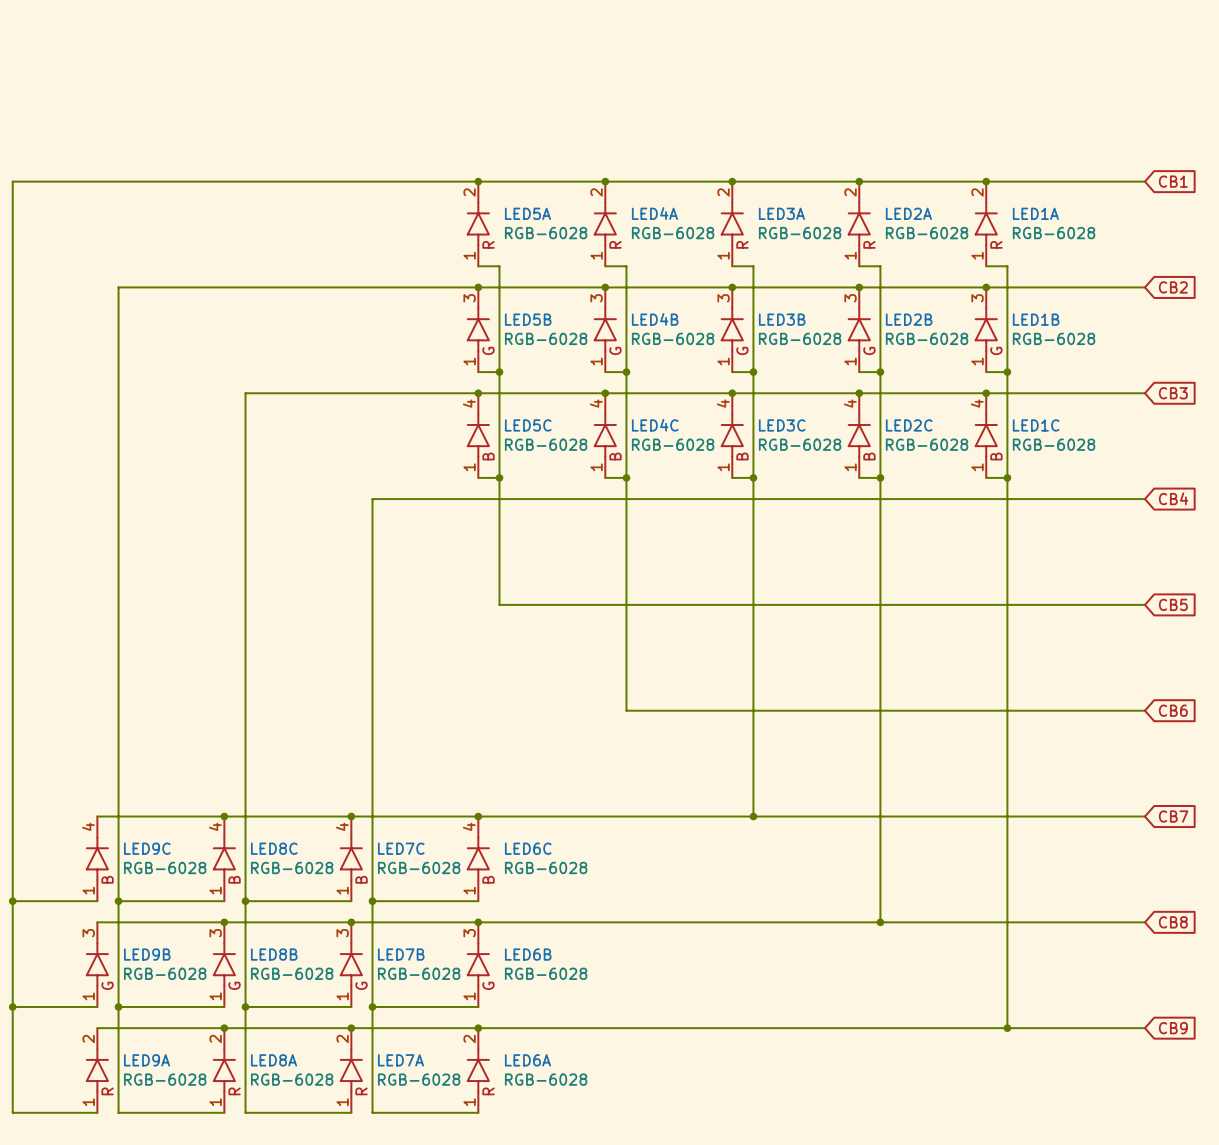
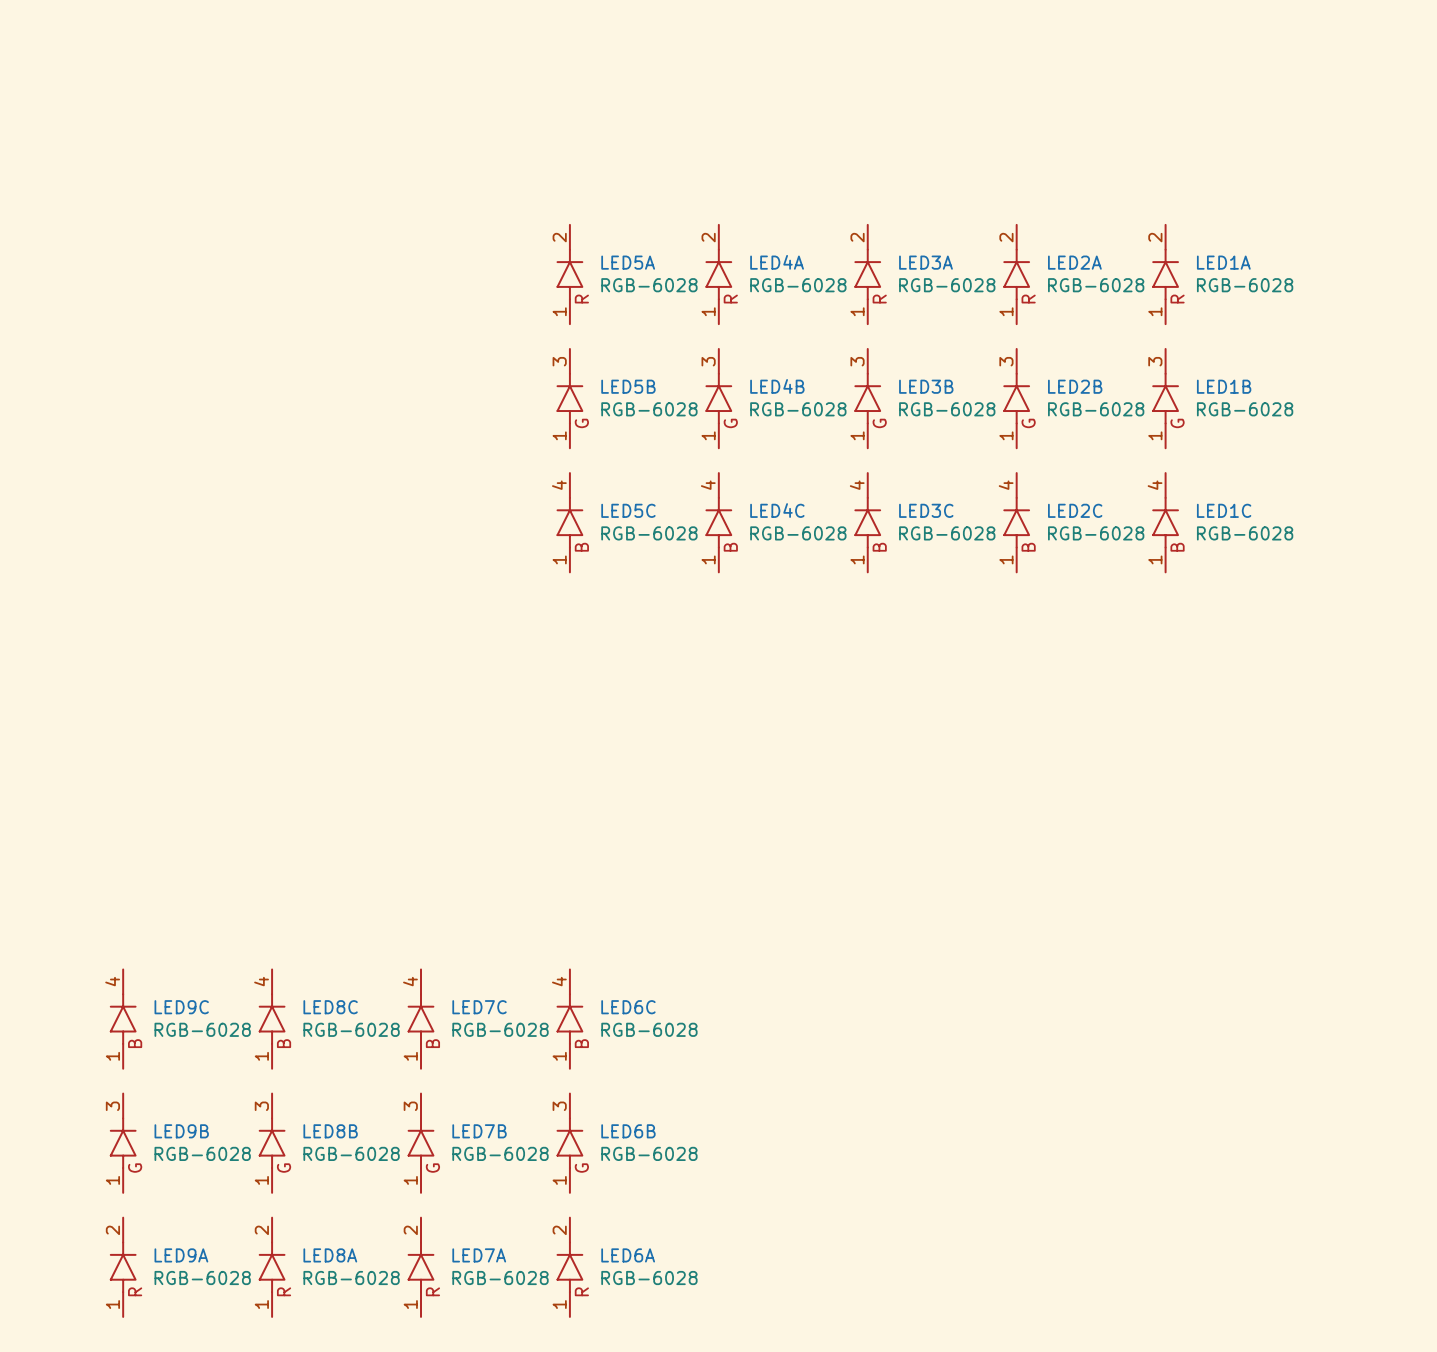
junction: (478, 181) -> none
junction: (605, 181) -> none
junction: (732, 181) -> none
junction: (859, 181) -> none
junction: (986, 181) -> none
wire: (1144, 181) (12, 181) (12, 1112) (97, 1112) -> none
global label: CB1 (1173, 181) -> none
wire: (478, 266) (499, 266) (499, 604) (1144, 604) -> none
wire: (605, 266) (626, 266) (626, 710) (1144, 710) -> none
wire: (732, 266) (753, 266) (753, 816) -> none
wire: (859, 266) (880, 266) (880, 922) -> none
wire: (986, 266) (1007, 266) (1007, 1028) -> none
junction: (478, 287) -> none
junction: (605, 287) -> none
junction: (732, 287) -> none
junction: (859, 287) -> none
junction: (986, 287) -> none
wire: (1144, 287) (118, 287) (118, 1112) (224, 1112) -> none
global label: CB2 (1173, 287) -> none
wire: (478, 372) (499, 372) -> none
junction: (499, 372) -> none
wire: (605, 372) (626, 372) -> none
junction: (626, 372) -> none
wire: (732, 372) (753, 372) -> none
junction: (753, 372) -> none
wire: (859, 372) (880, 372) -> none
junction: (880, 372) -> none
wire: (986, 372) (1007, 372) -> none
junction: (1007, 372) -> none
junction: (478, 393) -> none
junction: (605, 393) -> none
junction: (732, 393) -> none
junction: (859, 393) -> none
junction: (986, 393) -> none
wire: (1144, 393) (245, 393) (245, 1112) (351, 1112) -> none
global label: CB3 (1173, 393) -> none
wire: (478, 477) (499, 477) -> none
junction: (499, 477) -> none
wire: (605, 477) (626, 477) -> none
junction: (626, 477) -> none
wire: (732, 477) (753, 477) -> none
junction: (753, 477) -> none
wire: (859, 477) (880, 477) -> none
junction: (880, 477) -> none
wire: (986, 477) (1007, 477) -> none
junction: (1007, 477) -> none
global label: CB4 (1173, 498) -> none
wire: (1144, 499) (372, 499) (372, 1112) (478, 1112) -> none
global label: CB5 (1173, 604) -> none
global label: CB6 (1173, 710) -> none
wire: (97, 816) (1144, 816) -> none
junction: (224, 816) -> none
junction: (351, 816) -> none
junction: (478, 816) -> none
junction: (753, 816) -> none
global label: CB7 (1173, 816) -> none
wire: (12, 901) (97, 901) -> none
junction: (12, 901) -> none
wire: (118, 901) (224, 901) -> none
junction: (118, 901) -> none
wire: (245, 901) (351, 901) -> none
junction: (245, 901) -> none
wire: (372, 901) (478, 901) -> none
junction: (372, 901) -> none
wire: (97, 922) (1144, 922) -> none
junction: (224, 922) -> none
junction: (351, 922) -> none
junction: (478, 922) -> none
junction: (880, 922) -> none
global label: CB8 (1173, 922) -> none
wire: (12, 1006) (97, 1006) -> none
junction: (12, 1006) -> none
wire: (118, 1006) (224, 1006) -> none
junction: (118, 1006) -> none
wire: (245, 1006) (351, 1006) -> none
junction: (245, 1006) -> none
wire: (372, 1006) (478, 1006) -> none
junction: (372, 1006) -> none
wire: (97, 1028) (1144, 1028) -> none
junction: (224, 1028) -> none
junction: (351, 1028) -> none
junction: (478, 1028) -> none
junction: (1007, 1028) -> none
global label: CB9 (1173, 1028) -> none

